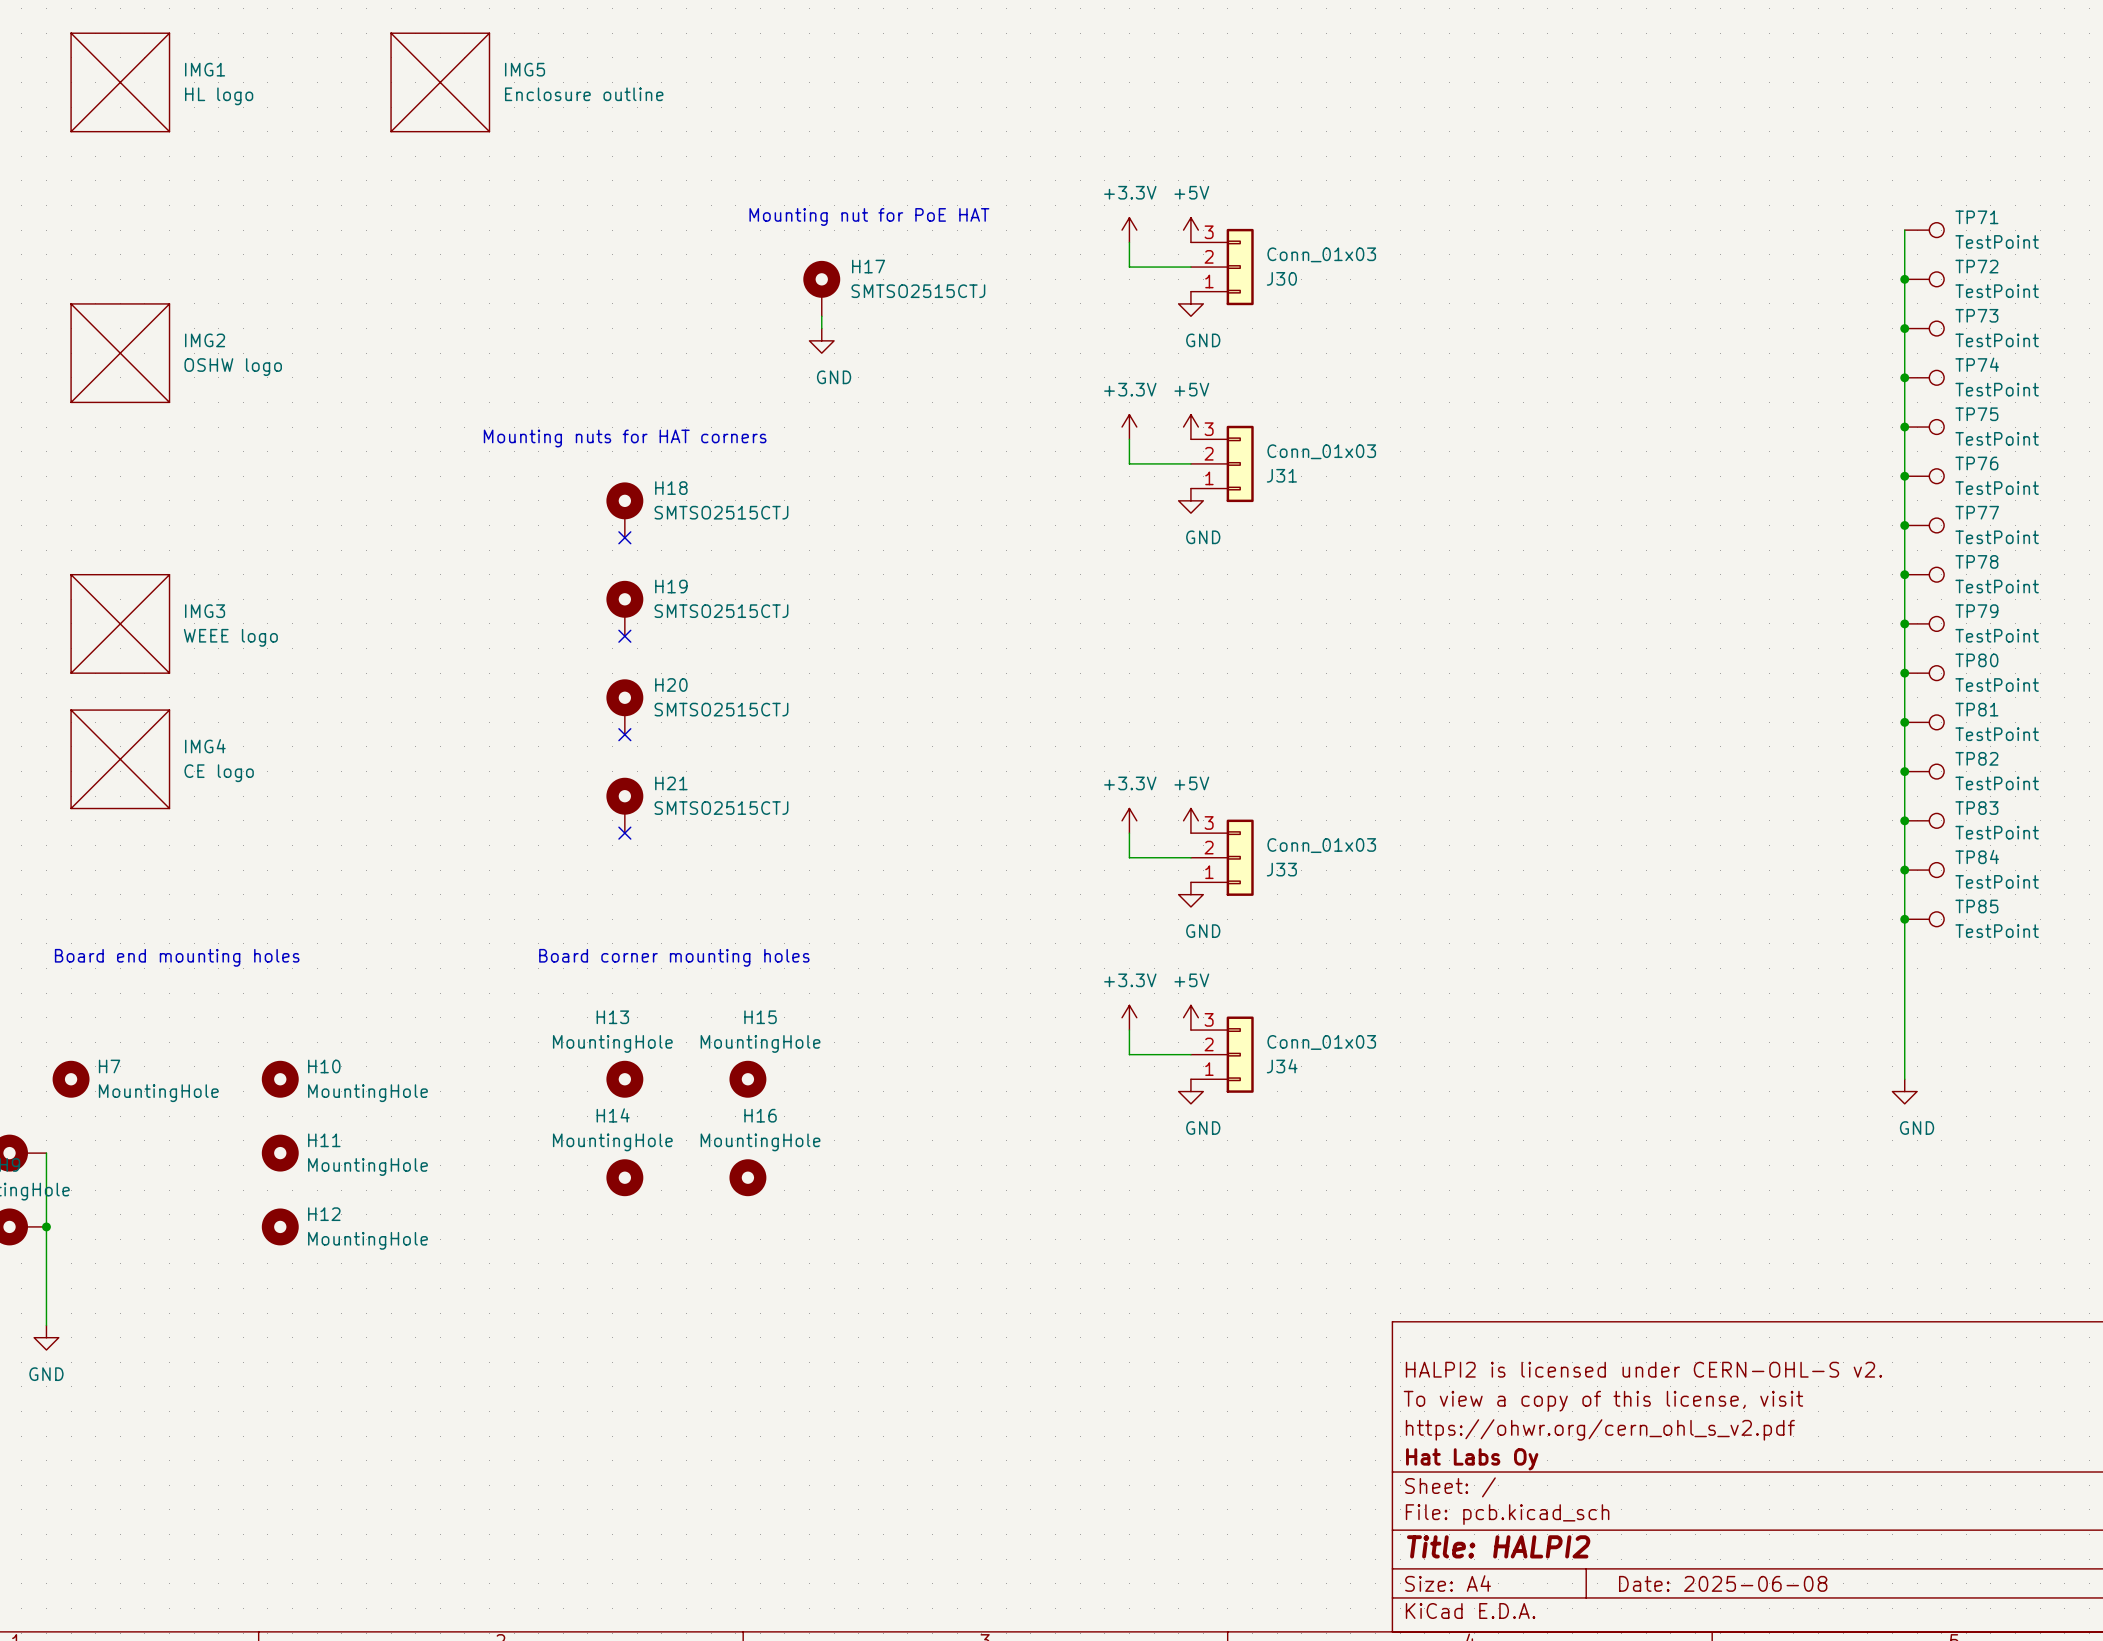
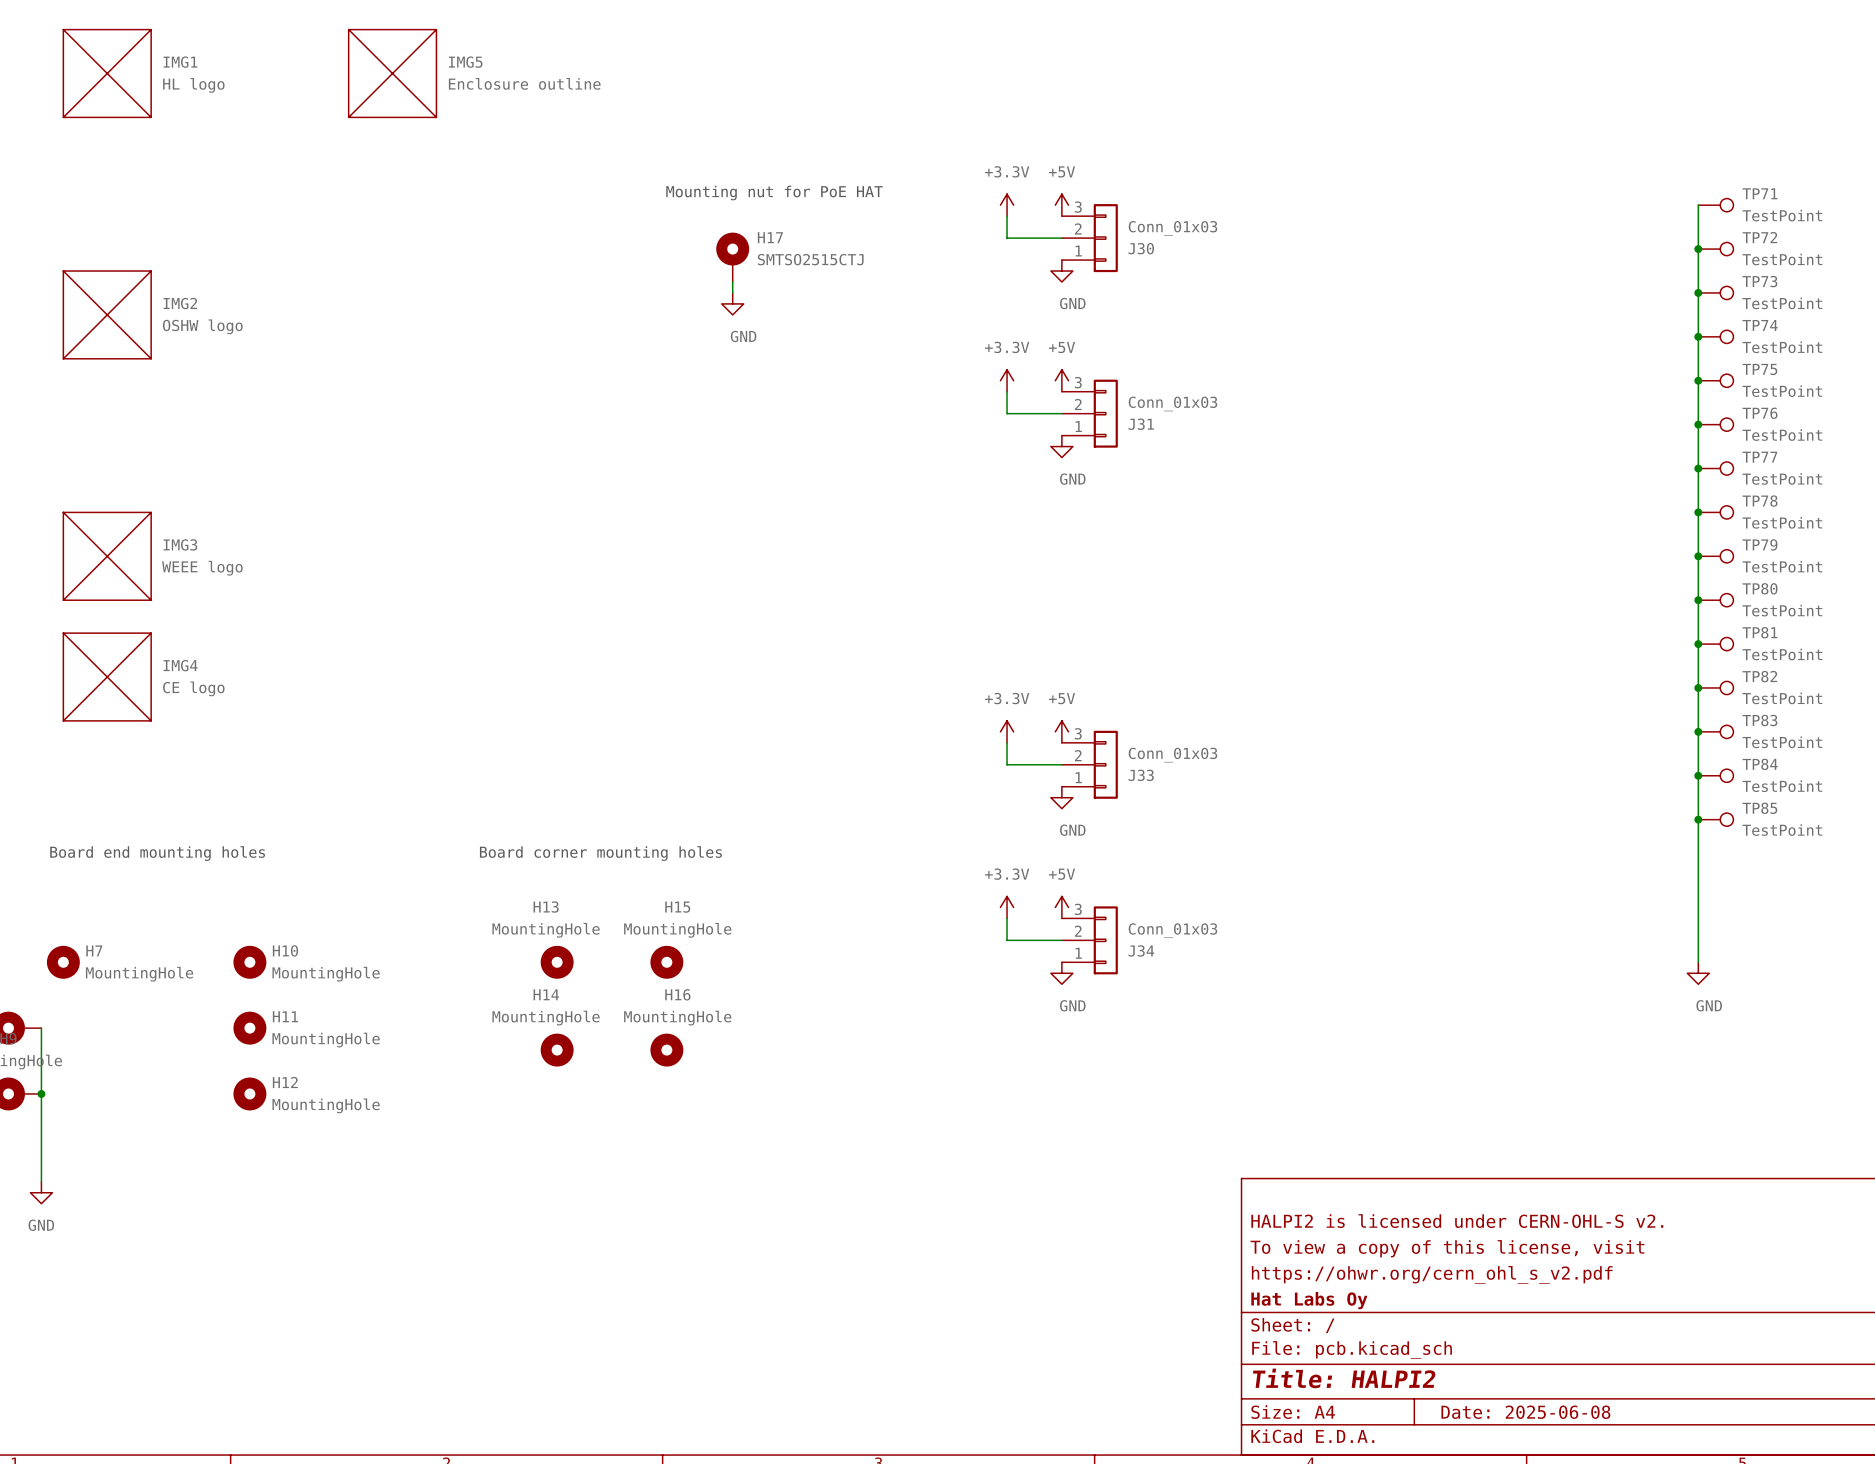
text: Mounting nuts for HAT corners (625, 438) -> none
H18: SMTSO2515CTJ (624, 510) -> none
no-connect mark: (624, 537) -> none
H19: SMTSO2515CTJ (624, 608) -> none
no-connect mark: (624, 636) -> none
H20: SMTSO2515CTJ (624, 706) -> none
no-connect mark: (624, 734) -> none
H21: SMTSO2515CTJ (624, 805) -> none
no-connect mark: (624, 833) -> none

